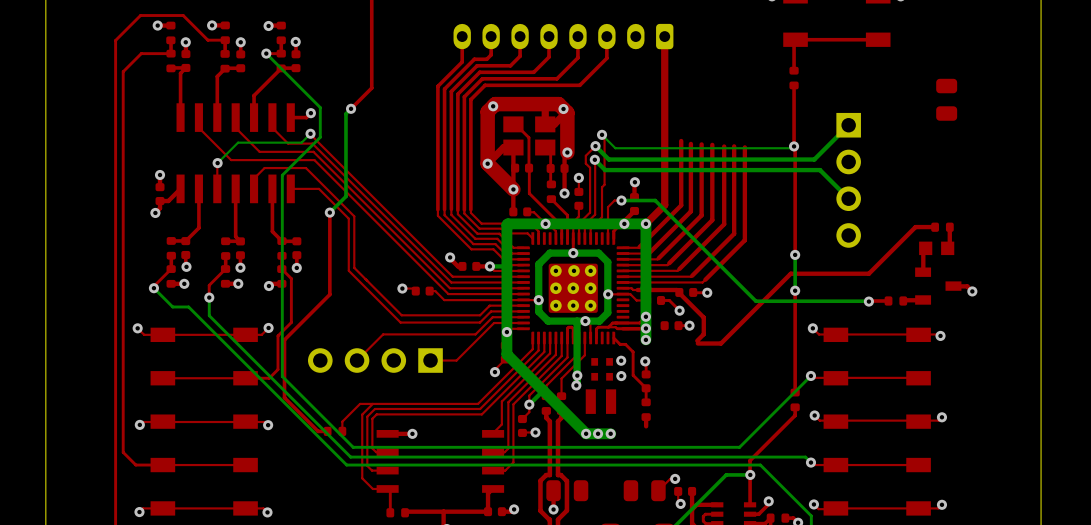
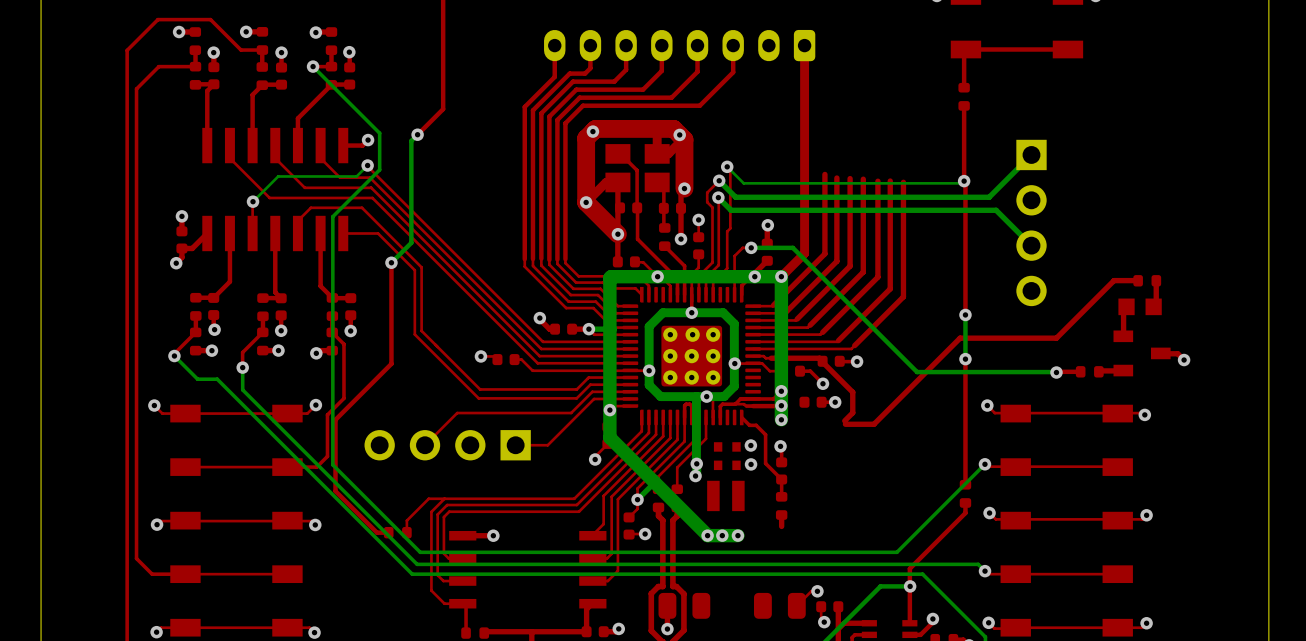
part: (946, 99) -> none

